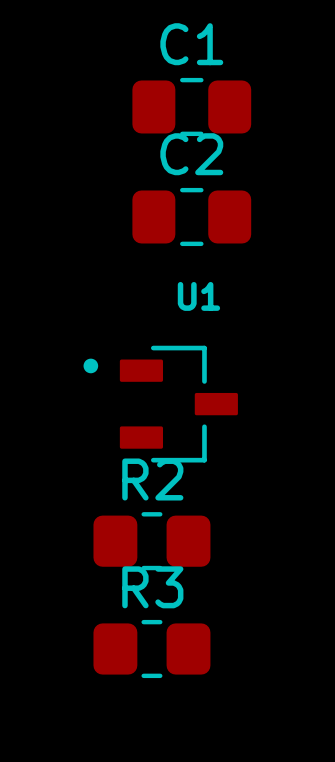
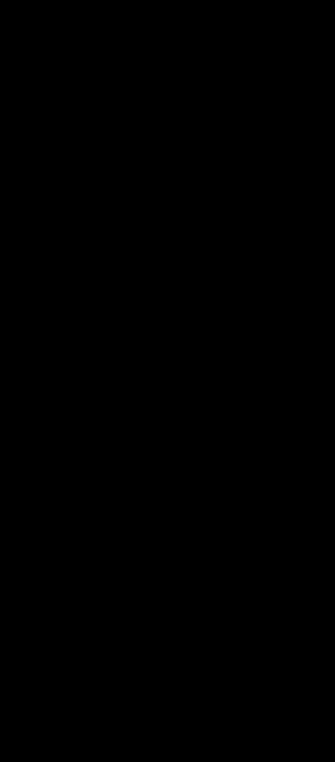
C1: (191, 106) -> none
C2: (191, 216) -> none
U1: (160, 404) -> none
R2: (151, 541) -> none
R3: (151, 648) -> none

